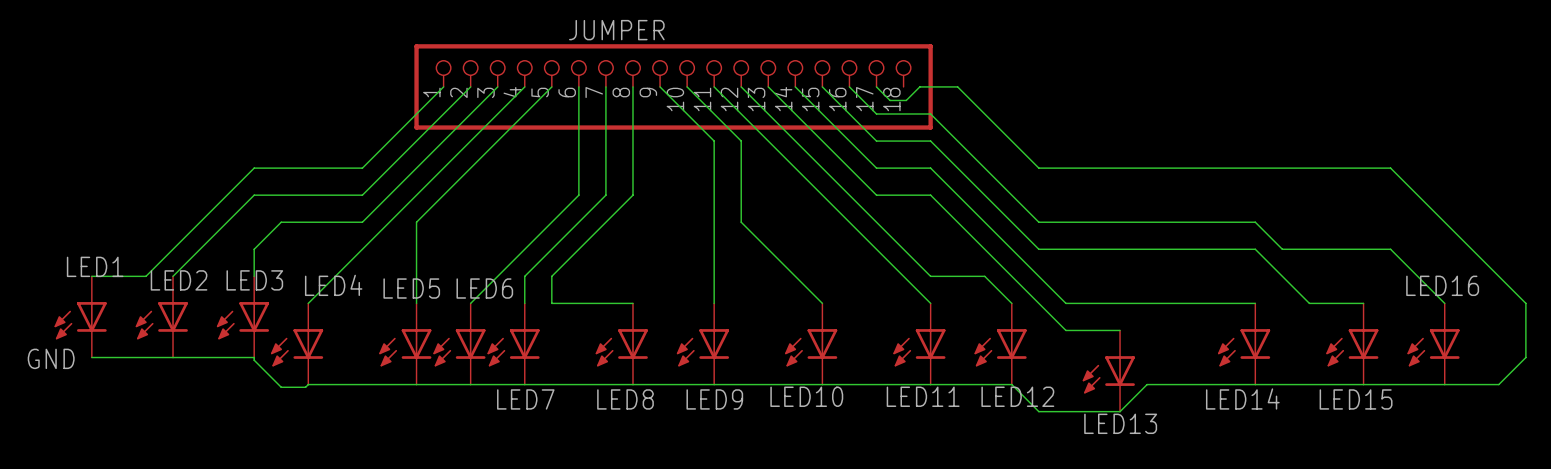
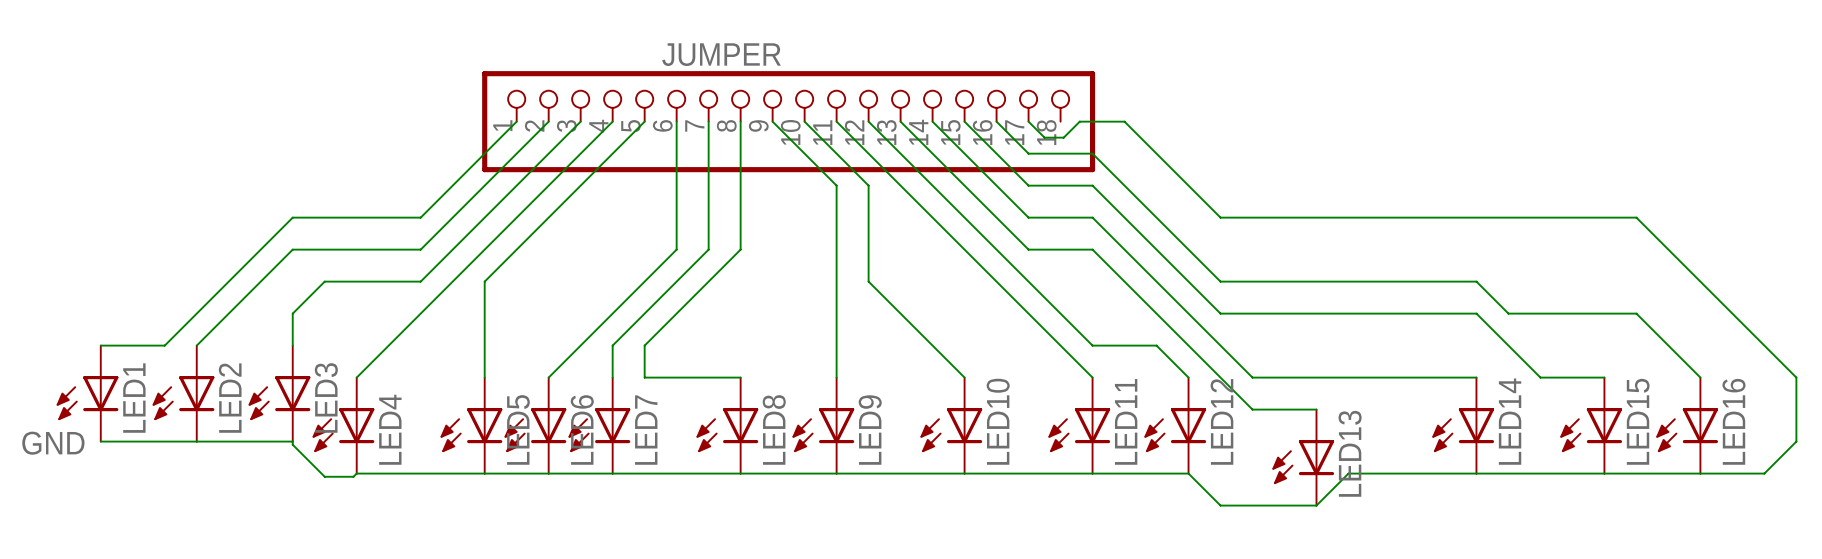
LED1 name rotation: 0° (95, 266) -> 90° counterclockwise (134, 398)
LED2 name rotation: 0° (179, 280) -> 90° counterclockwise (230, 398)
LED3 name rotation: 0° (254, 280) -> 90° counterclockwise (326, 397)
LED4 name rotation: 0° (333, 285) -> 90° counterclockwise (390, 429)
LED16 name rotation: 0° (1442, 285) -> 90° counterclockwise (1733, 421)
LED5 name rotation: 0° (411, 288) -> 90° counterclockwise (518, 429)
LED6 name rotation: 0° (484, 288) -> 90° counterclockwise (582, 429)
LED10 name rotation: 0° (806, 396) -> 90° counterclockwise (998, 421)
LED11 name rotation: 0° (923, 396) -> 90° counterclockwise (1126, 421)
LED12 name rotation: 0° (1017, 396) -> 90° counterclockwise (1221, 421)
LED7 name rotation: 0° (525, 399) -> 90° counterclockwise (646, 430)
LED8 name rotation: 0° (625, 399) -> 90° counterclockwise (774, 429)
LED9 name rotation: 0° (714, 399) -> 90° counterclockwise (870, 430)
LED14 name rotation: 0° (1242, 399) -> 90° counterclockwise (1510, 421)
LED15 name rotation: 0° (1356, 399) -> 90° counterclockwise (1638, 421)
LED13 name rotation: 0° (1120, 423) -> 90° counterclockwise (1350, 453)

